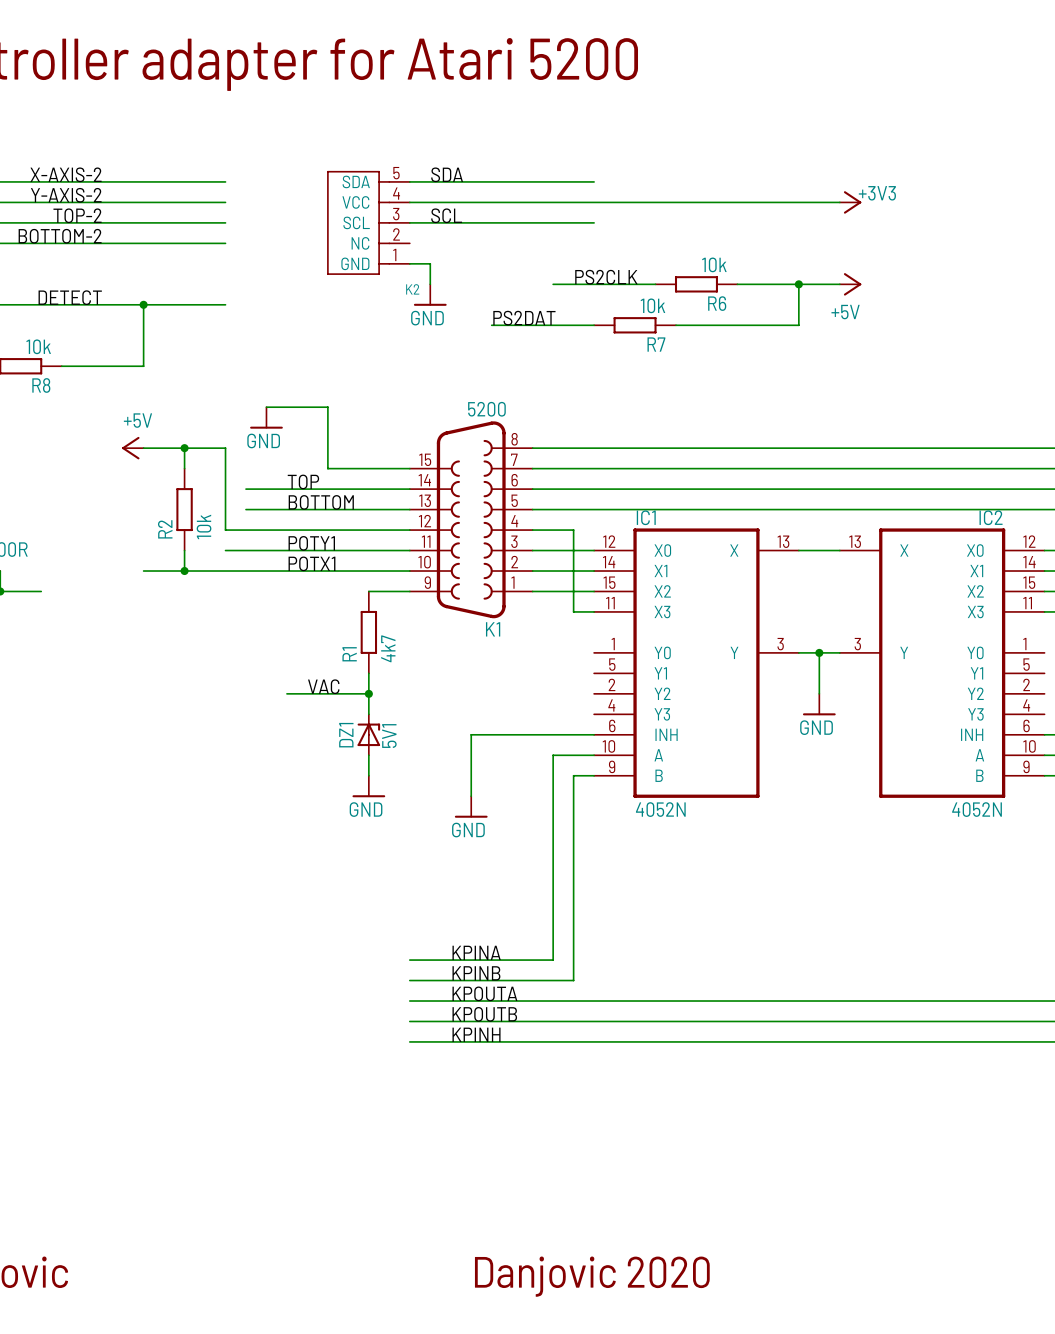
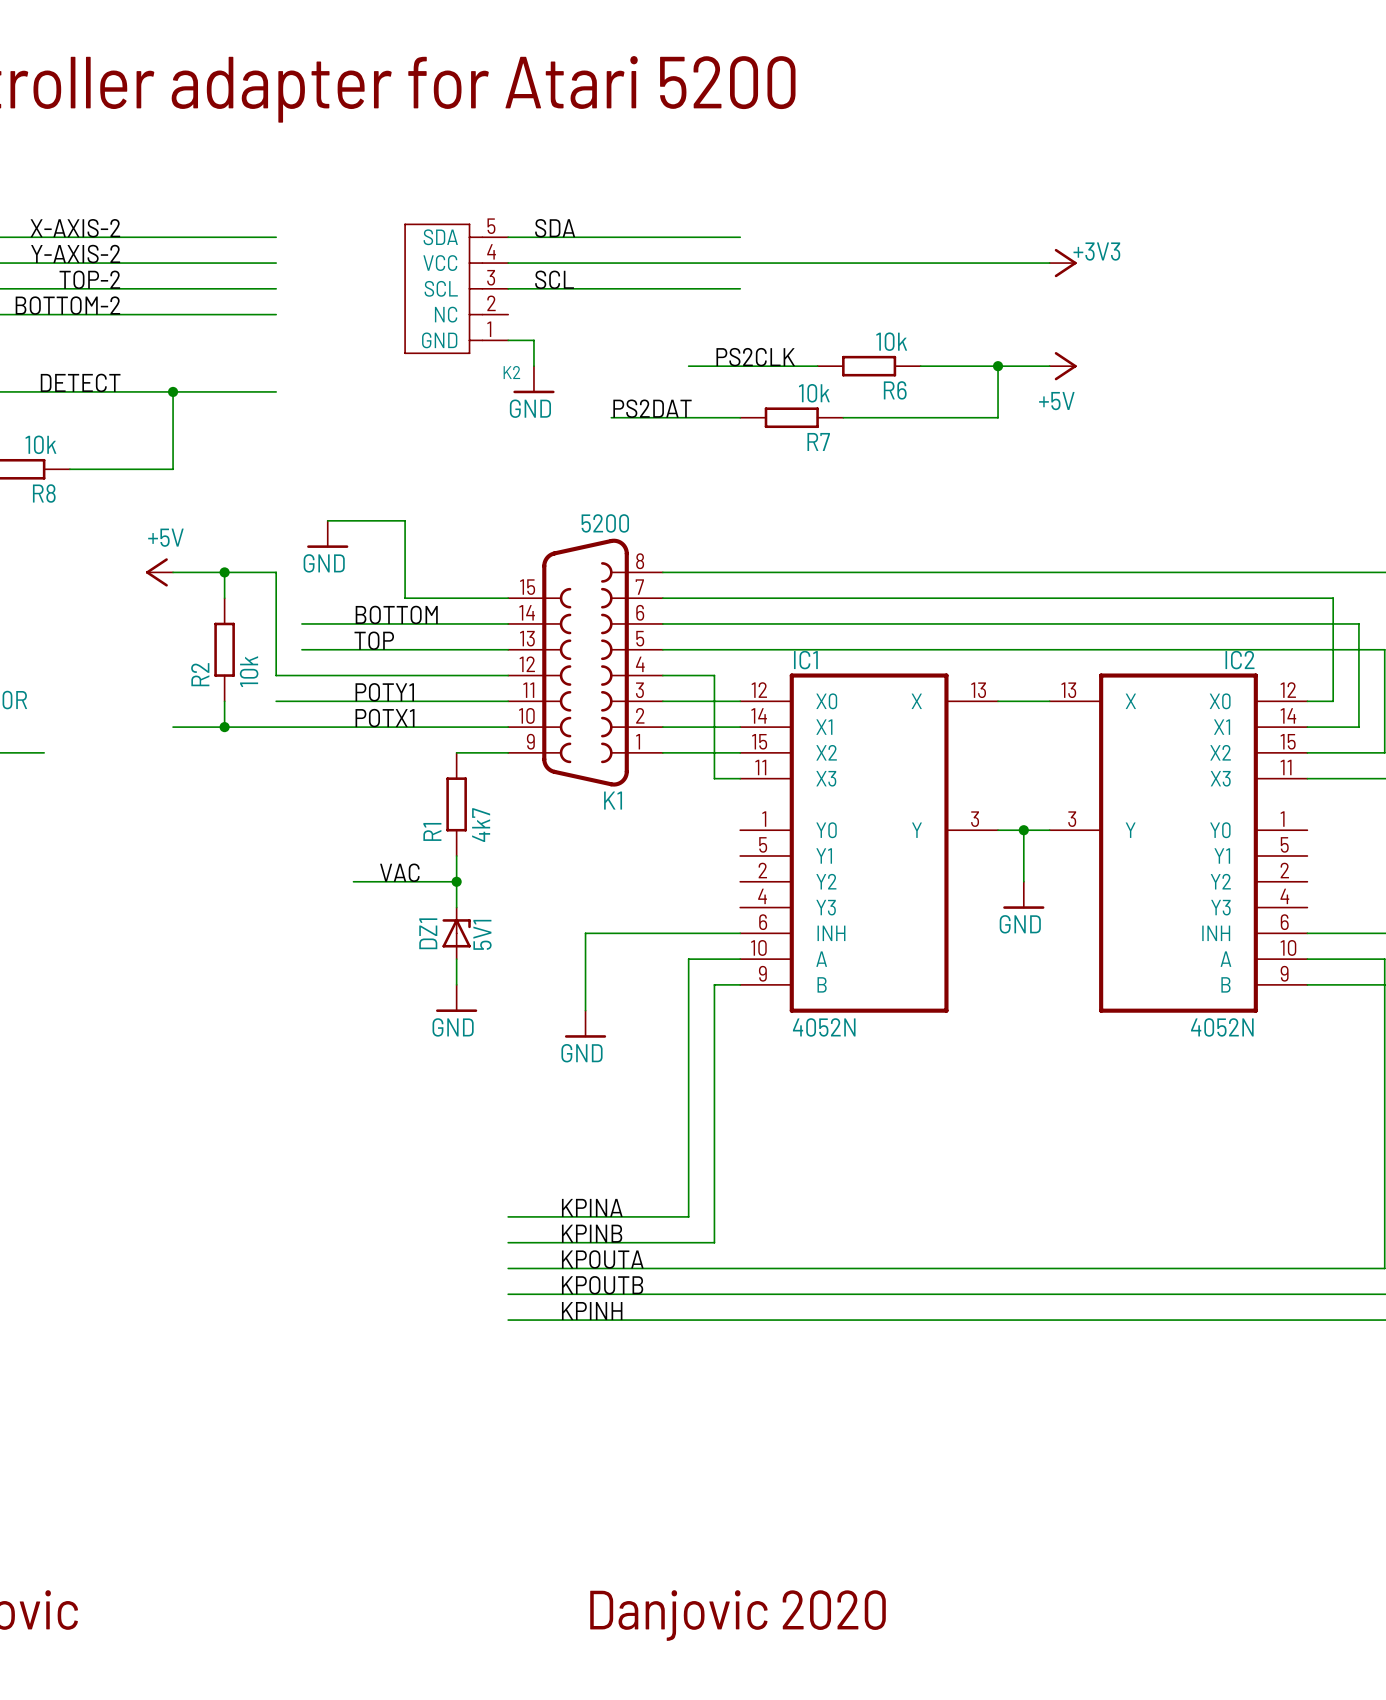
label: TOP (303, 481) -> BOTTOM (396, 614)
label: BOTTOM (321, 502) -> TOP (374, 640)

